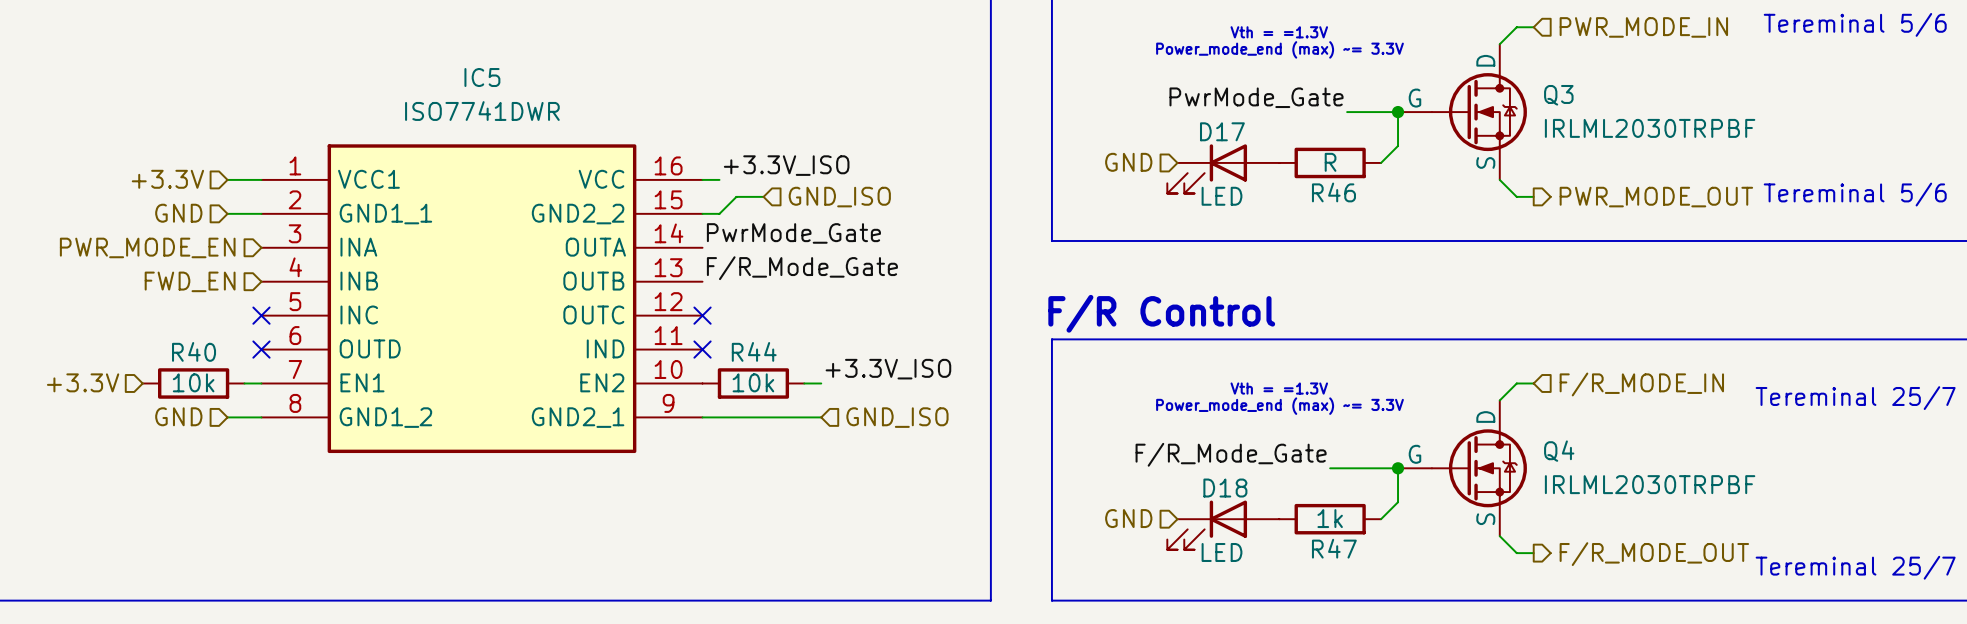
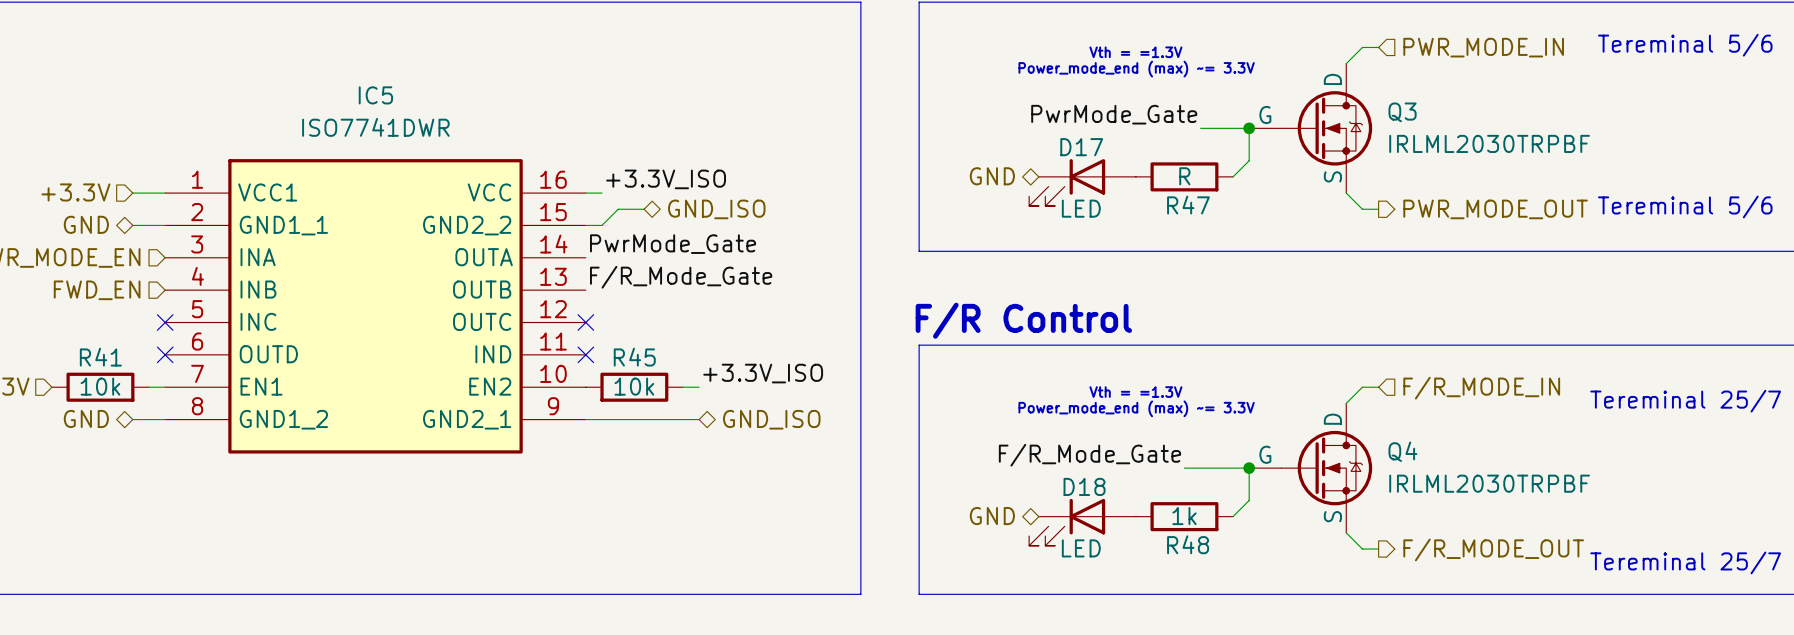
hierarchical label shape: input (1128, 162) -> bidirectional (992, 176)
R46 name: R46 (1333, 192) -> R47 (1188, 205)
hierarchical label shape: input (839, 197) -> bidirectional (716, 209)
hierarchical label shape: input (178, 213) -> bidirectional (86, 224)
R40 name: R40 (194, 351) -> R41 (100, 357)
R44 name: R44 (754, 351) -> R45 (634, 357)
hierarchical label shape: input (178, 416) -> bidirectional (86, 418)
hierarchical label shape: input (897, 417) -> bidirectional (771, 419)
hierarchical label shape: input (1128, 518) -> bidirectional (992, 516)
R47 name: R47 (1334, 548) -> R48 (1188, 544)

